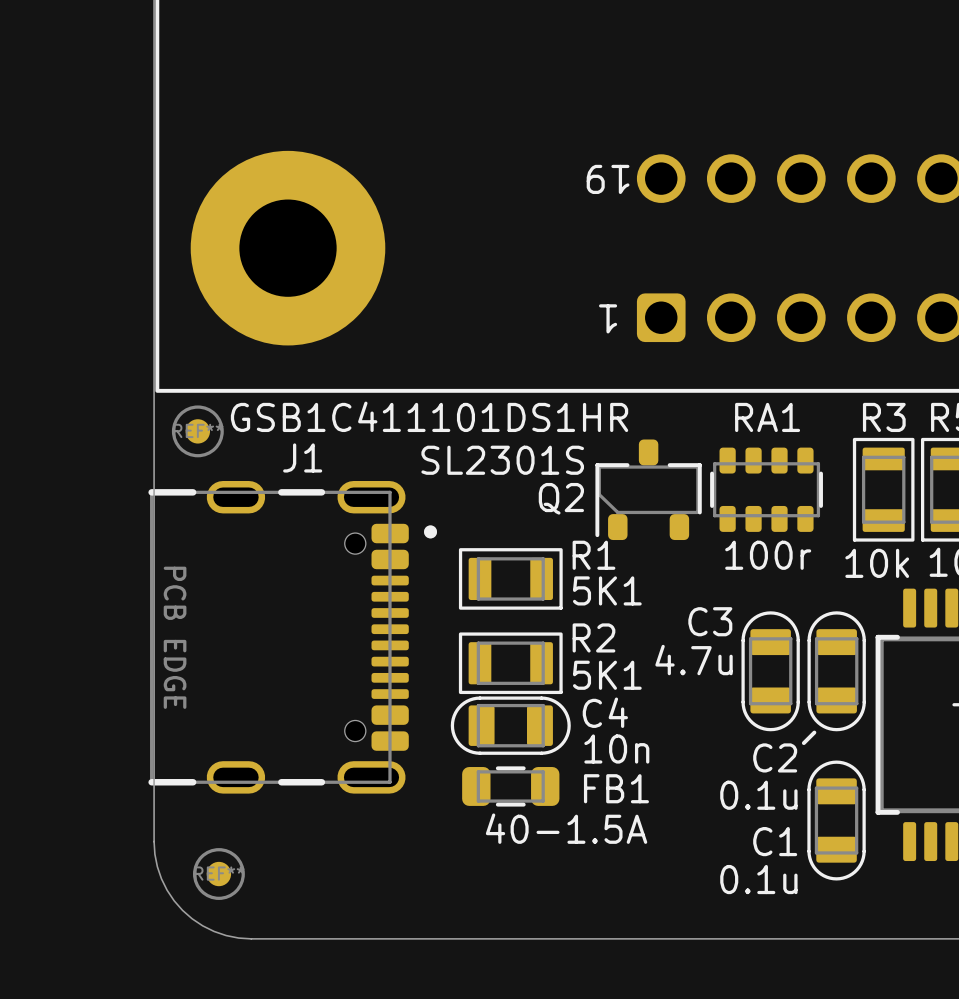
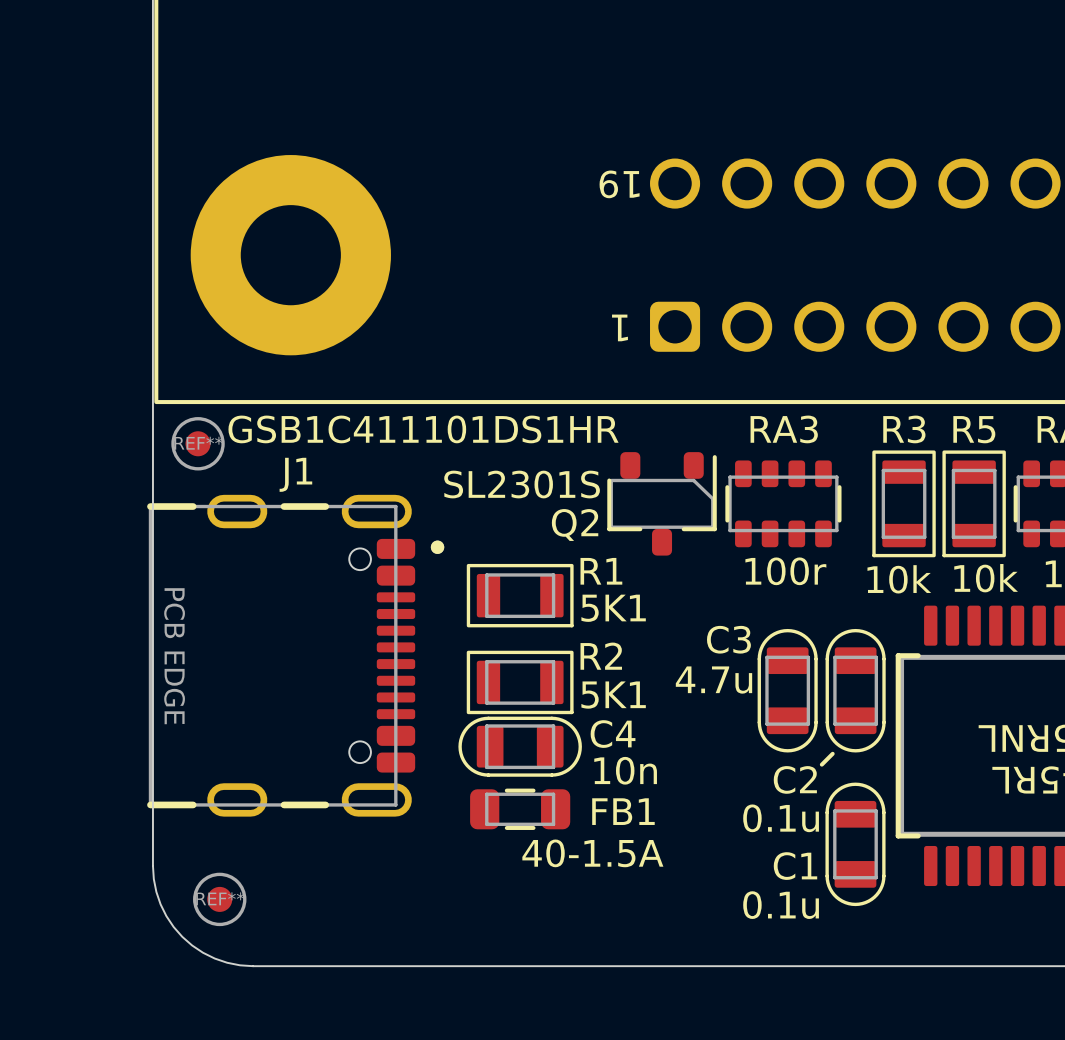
RA1 name: RA1 (767, 417) -> RA3 (784, 429)
Q2 rotation: 0° (648, 489) -> 180° (662, 503)

